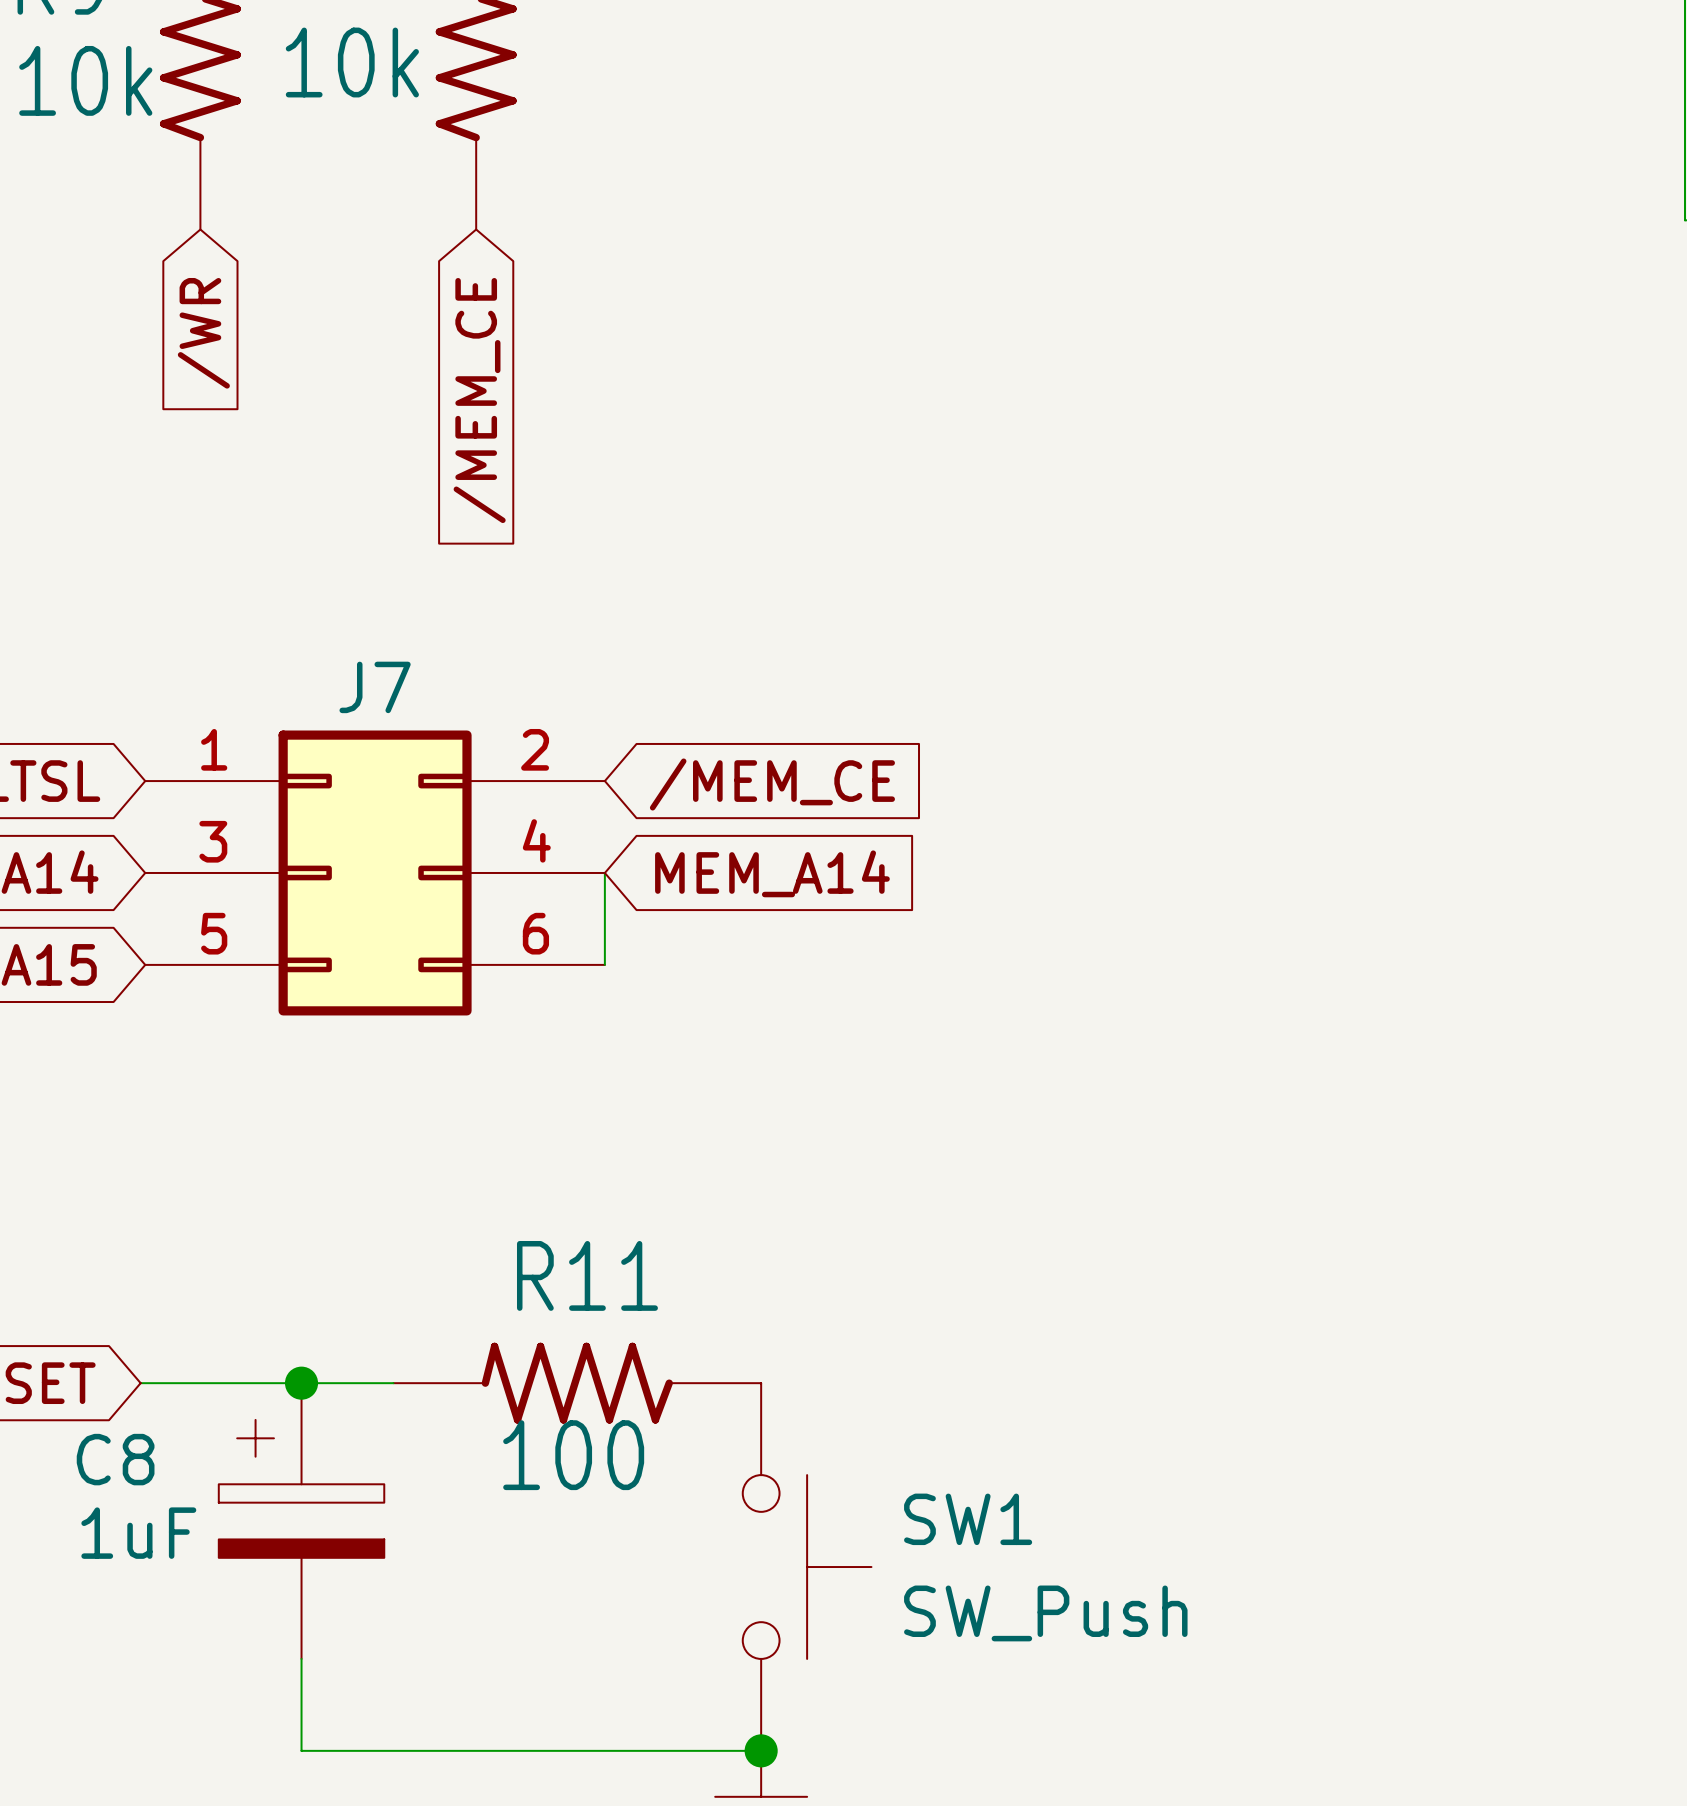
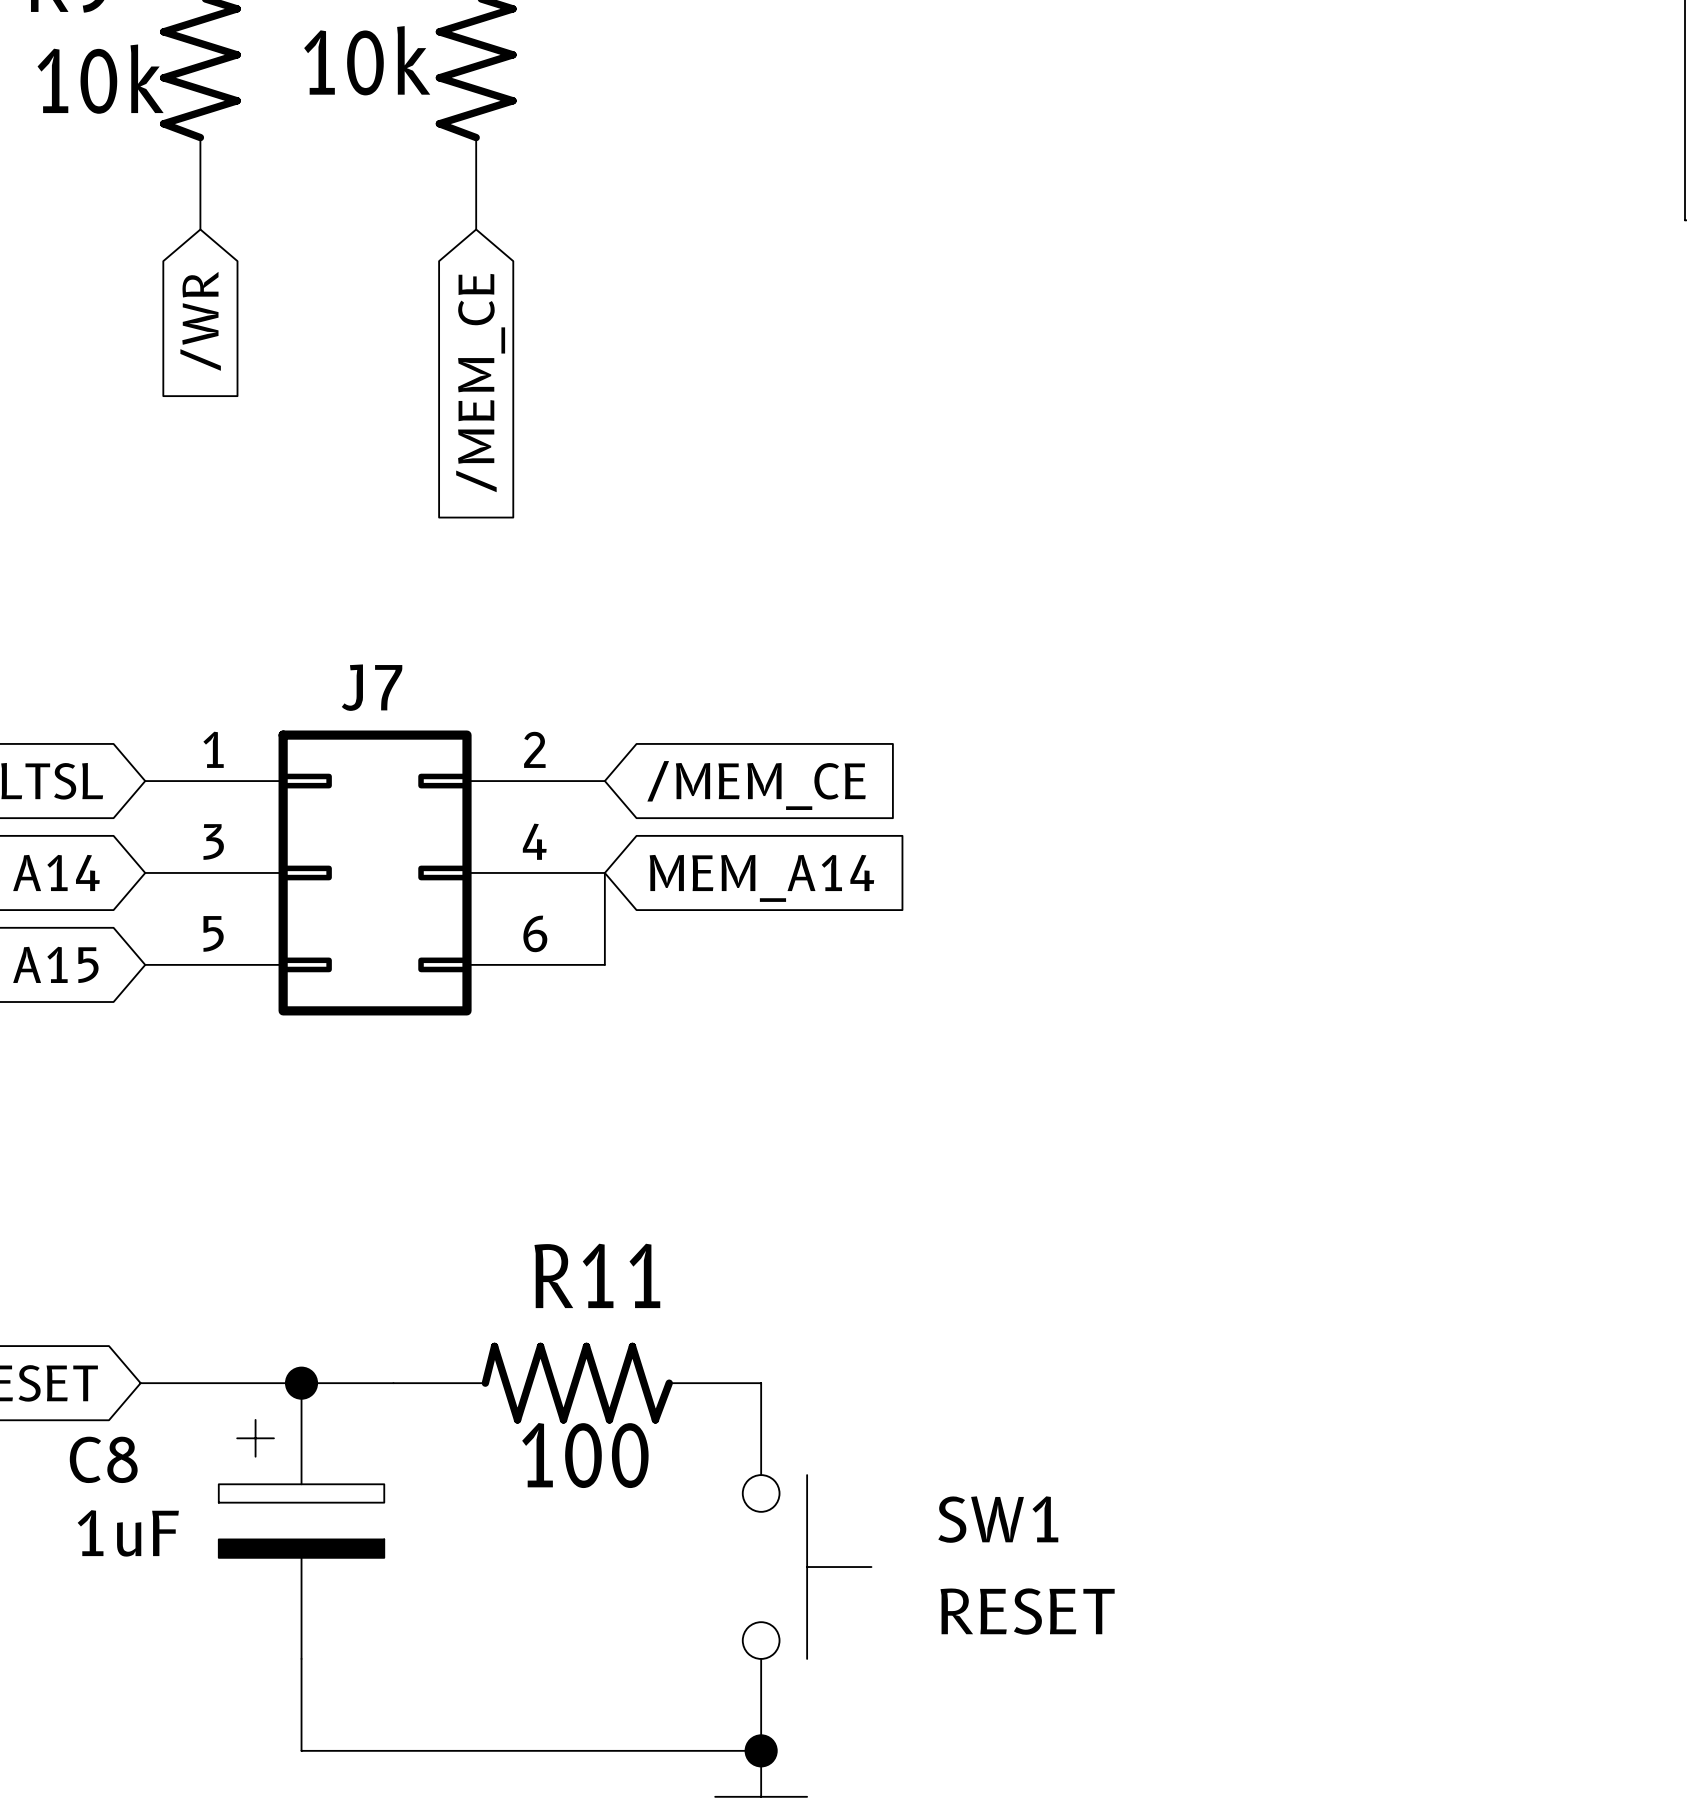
SW1 name position: SW1 (968, 1519) -> SW1 (998, 1519)
SW1 value: SW_Push (1045, 1613) -> RESET (1027, 1611)

